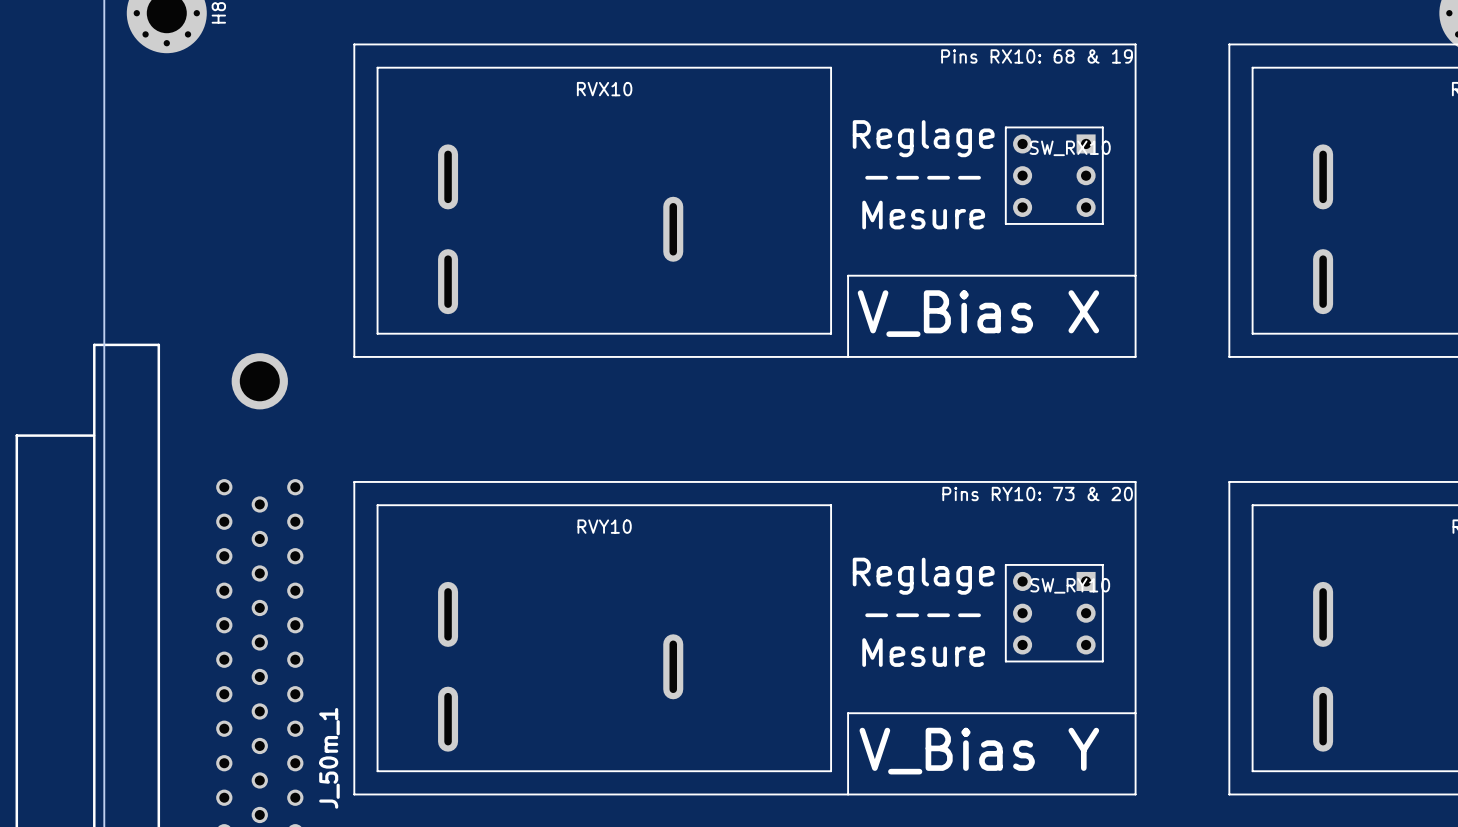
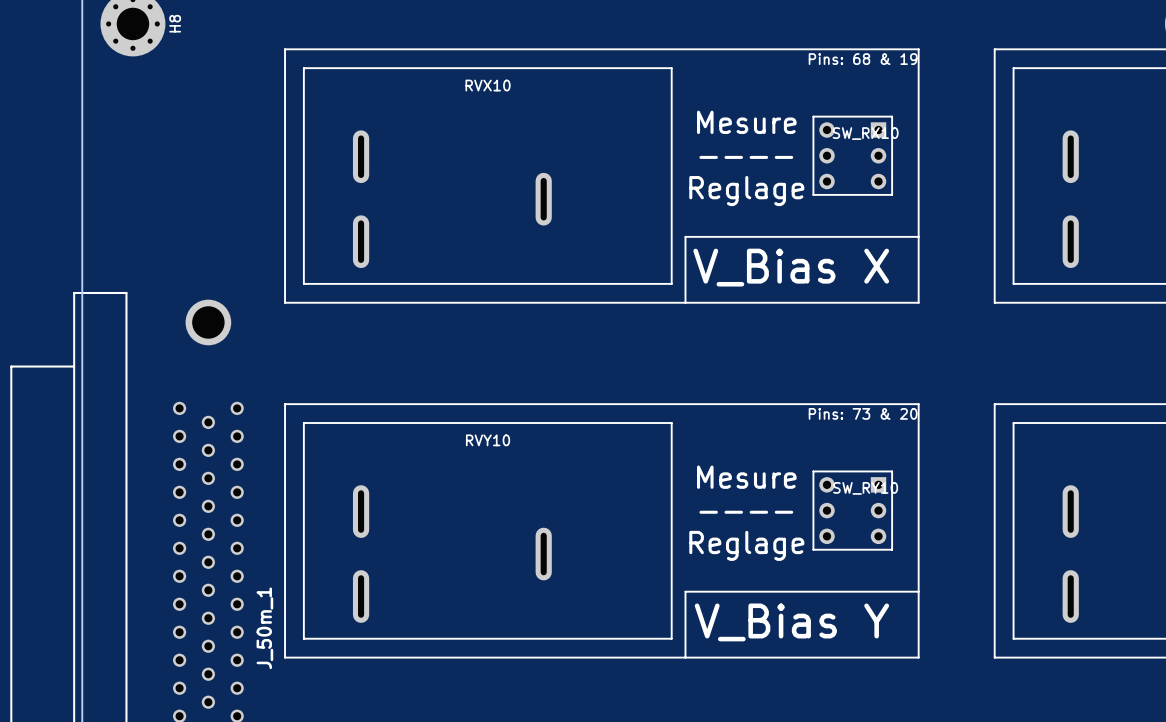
text: Pins RX10: 68 & 19 (1037, 56) -> Pins: 68 & 19 (863, 59)
text: Reglage (923, 138) -> Mesure (746, 122)
text: Mesure (923, 215) -> Reglage (746, 191)
text: Pins RY10: 73 & 20 (1037, 494) -> Pins: 73 & 20 (863, 413)
text: Reglage (923, 576) -> Mesure (746, 477)
text: Mesure (923, 652) -> Reglage (746, 545)

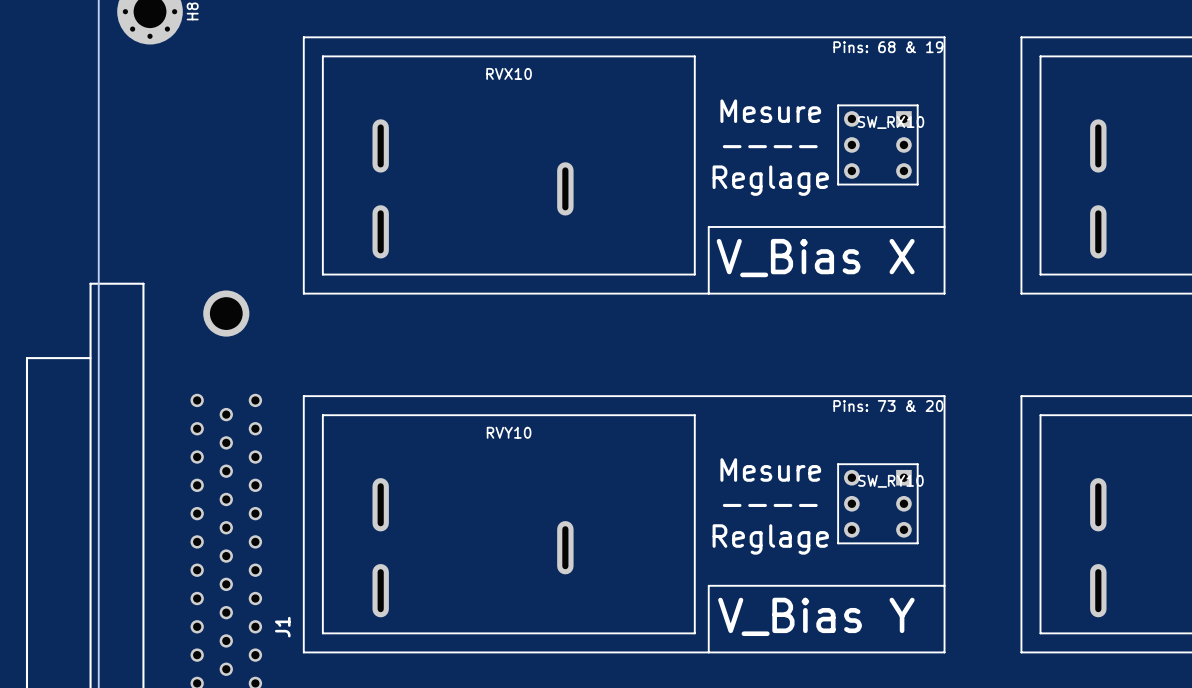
J_50m_1 name: J_50m_1 (264, 628) -> J1 (282, 627)

